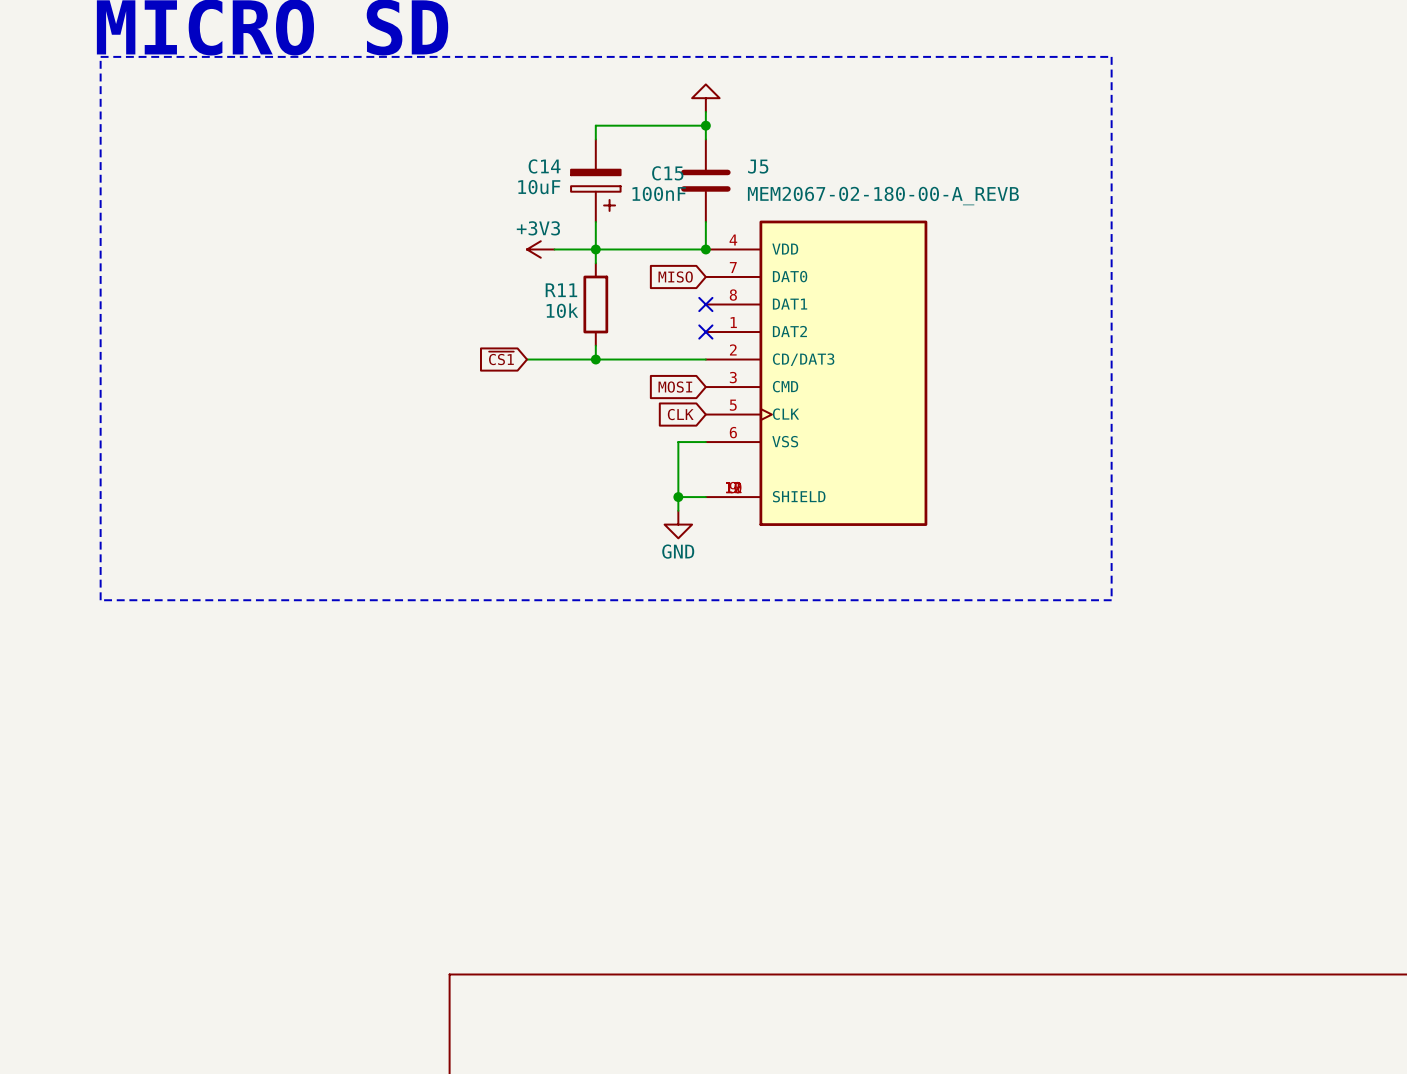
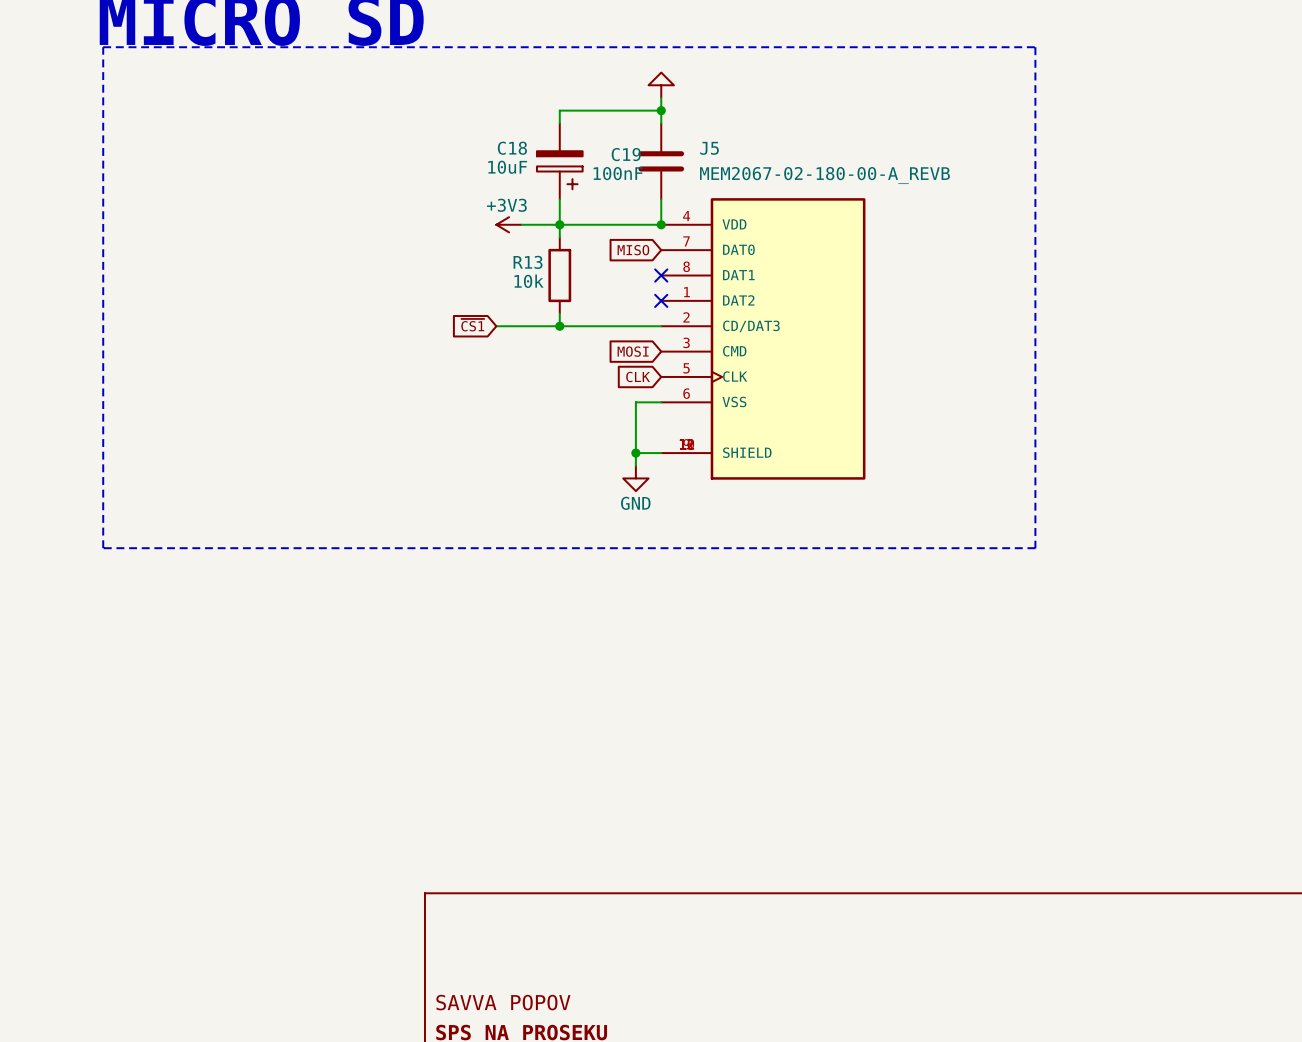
C14 name: C14 (544, 166) -> C18 (512, 148)
C15 name: C15 (667, 173) -> C19 (626, 154)
R11 name: R11 (561, 290) -> R13 (528, 262)

